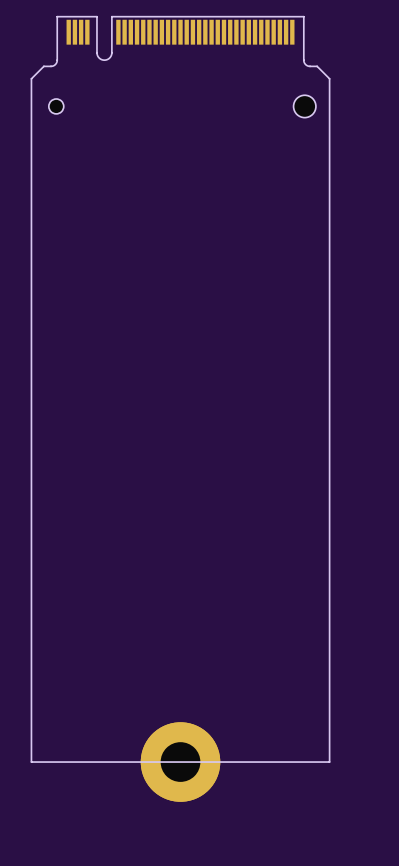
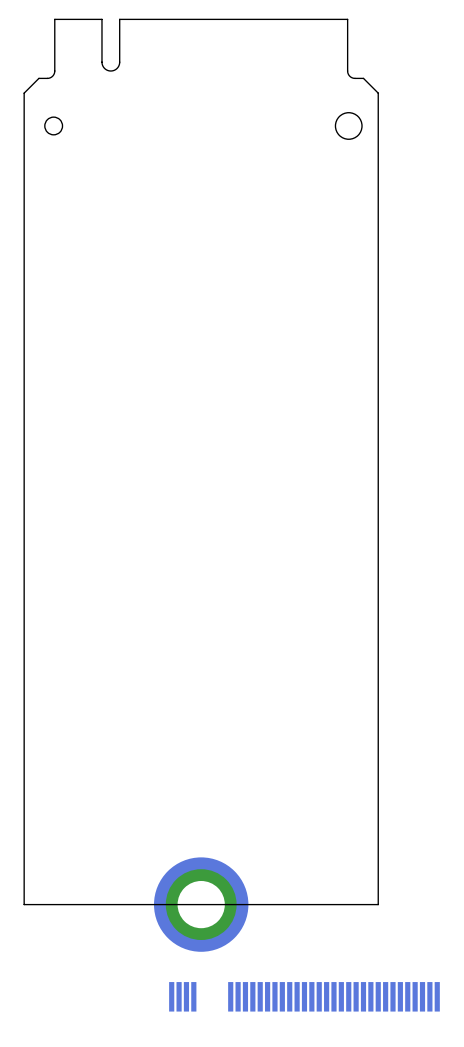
part: (180, 32) -> none
part footprint: [140, 722, 221, 802] -> [153, 857, 249, 952]
part: none -> (304, 996)

